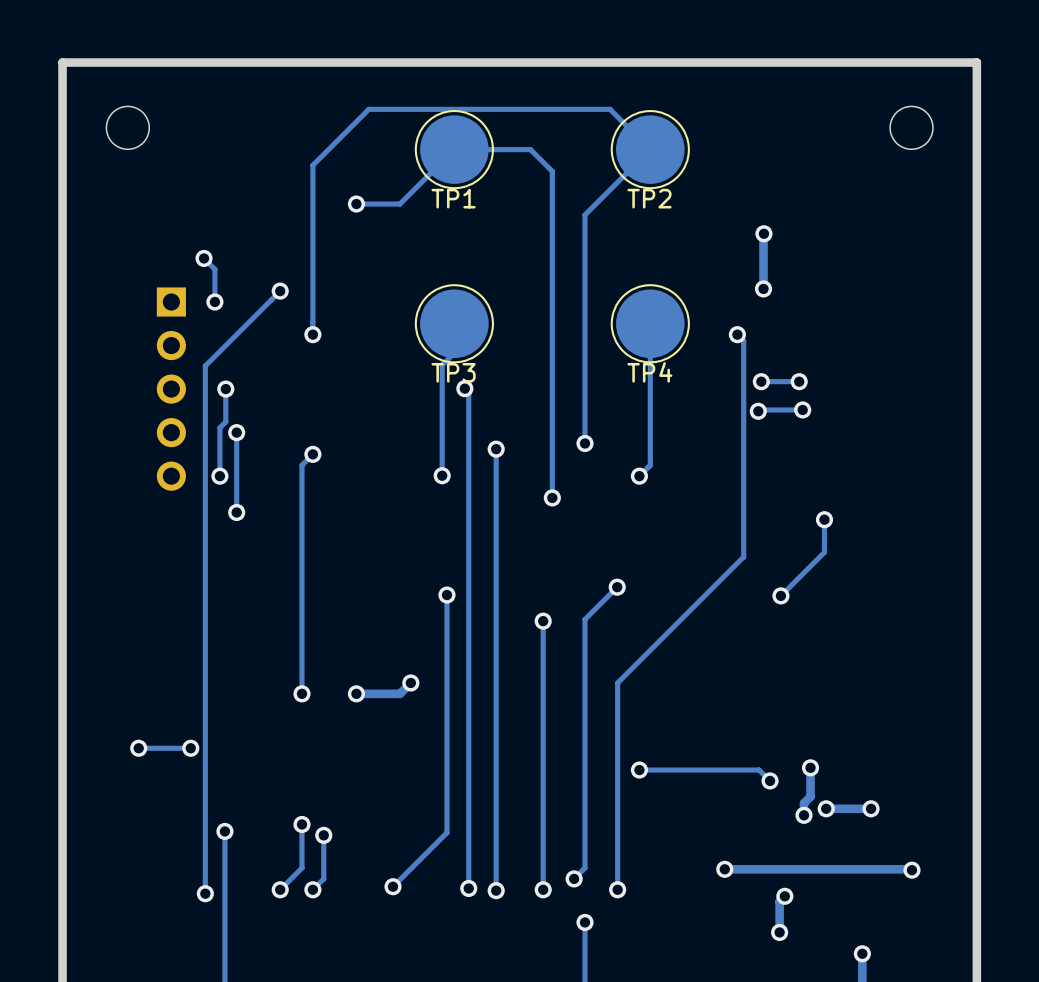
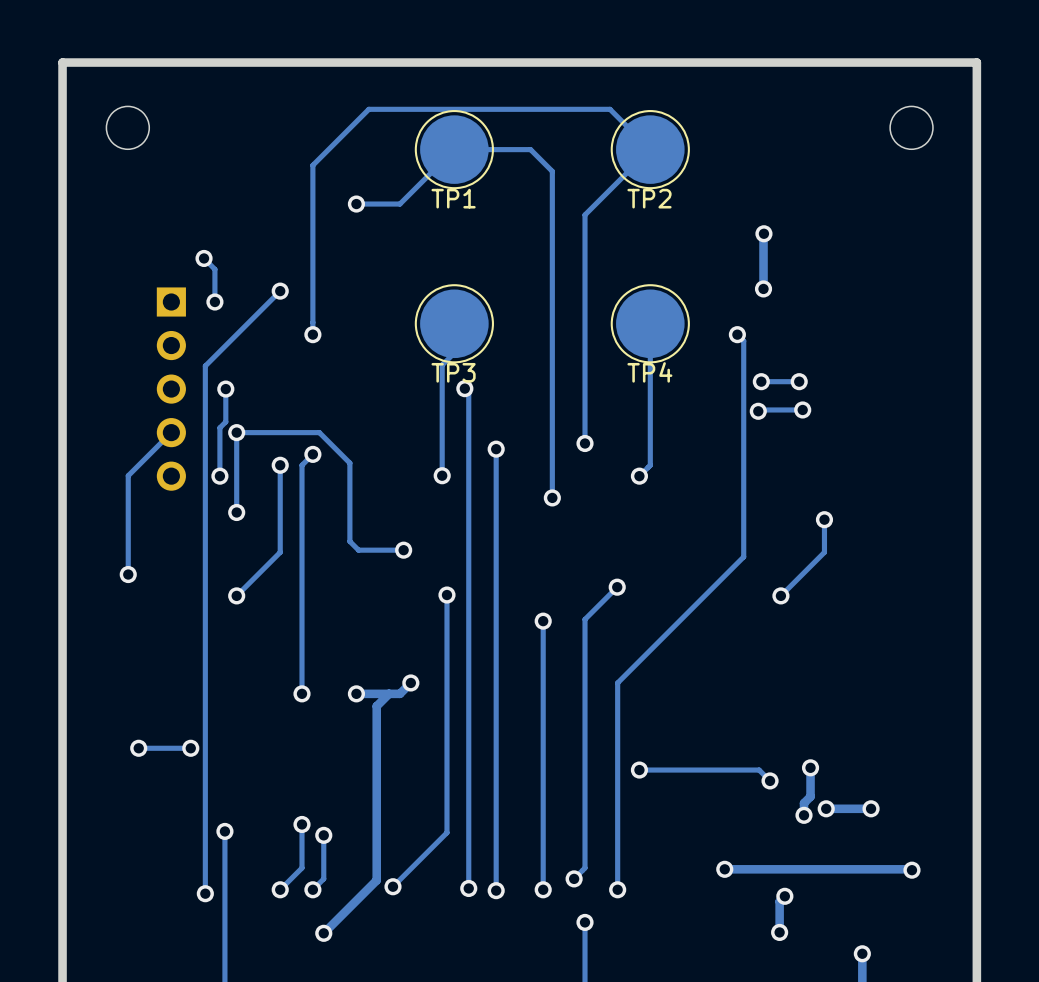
track: none -> (171, 432) (128, 475) (128, 574)
track: none -> (236, 432) (319, 432) (349, 463) (349, 541) (358, 550) (403, 550)
track: none -> (280, 465) (280, 552) (236, 595)
via: none -> (280, 465)
via: none -> (403, 550)
via: none -> (128, 574)
via: none -> (236, 595)
track: none -> (389, 693) (376, 706) (376, 880) (323, 933)
via: none -> (323, 933)

